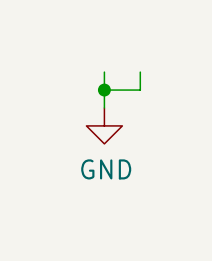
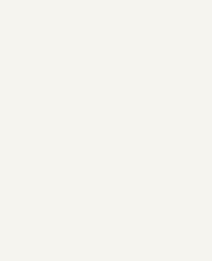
wire: (104, 72) (104, 107) -> none
wire: (140, 72) (140, 90) (104, 90) -> none
junction: (104, 90) -> none
power symbol: GND (104, 125) -> none

